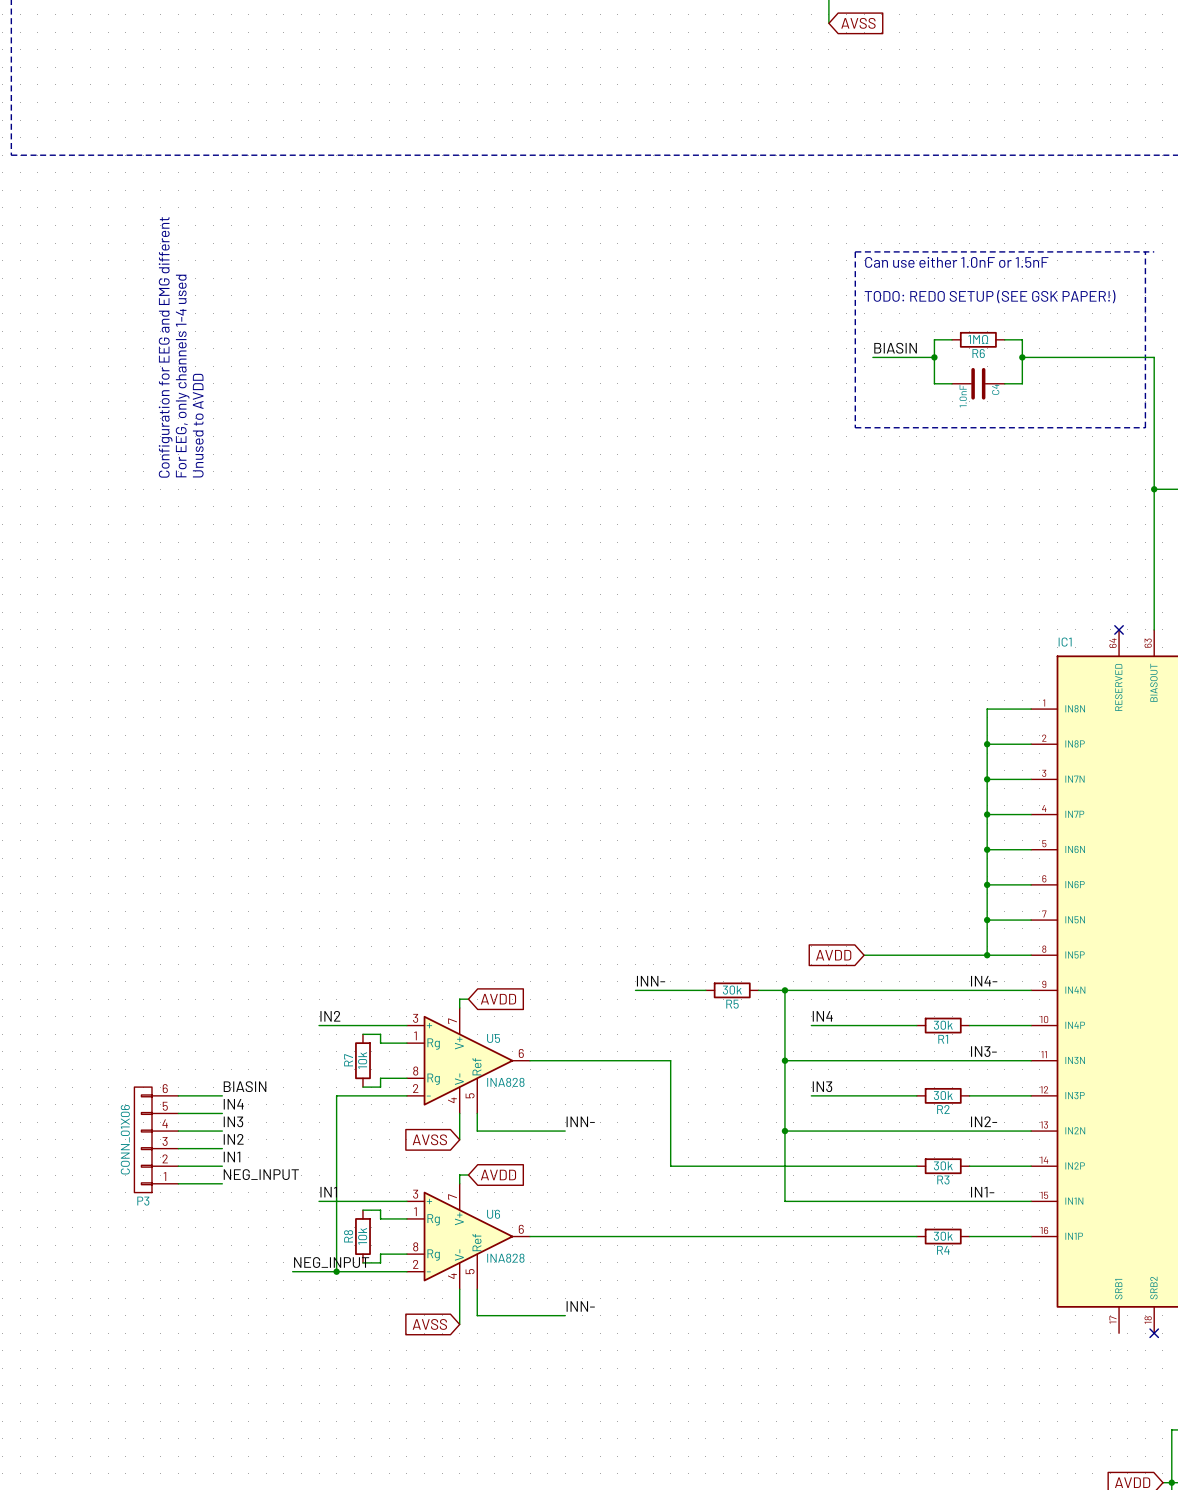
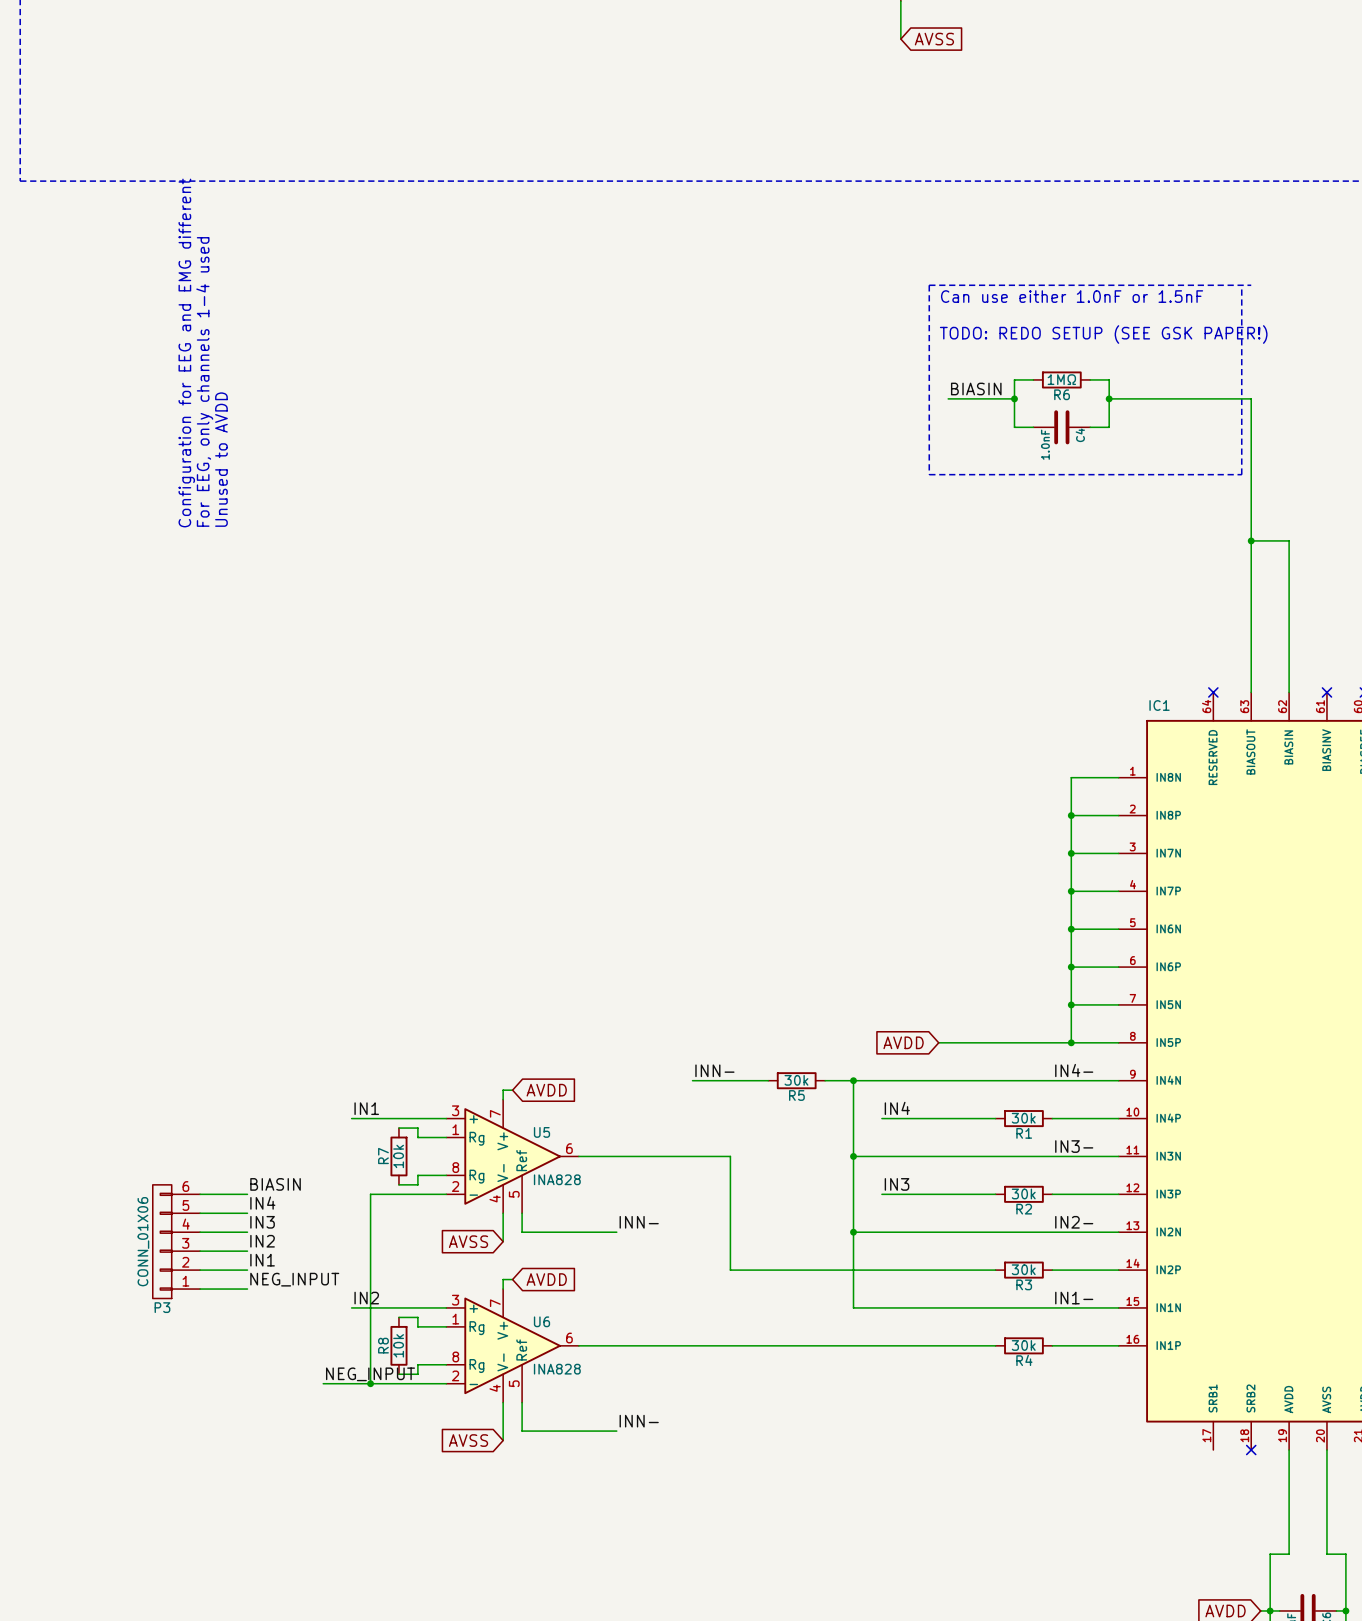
label: IN2 (330, 1016) -> IN1 (366, 1108)
label: IN1 (328, 1192) -> IN2 (366, 1298)

